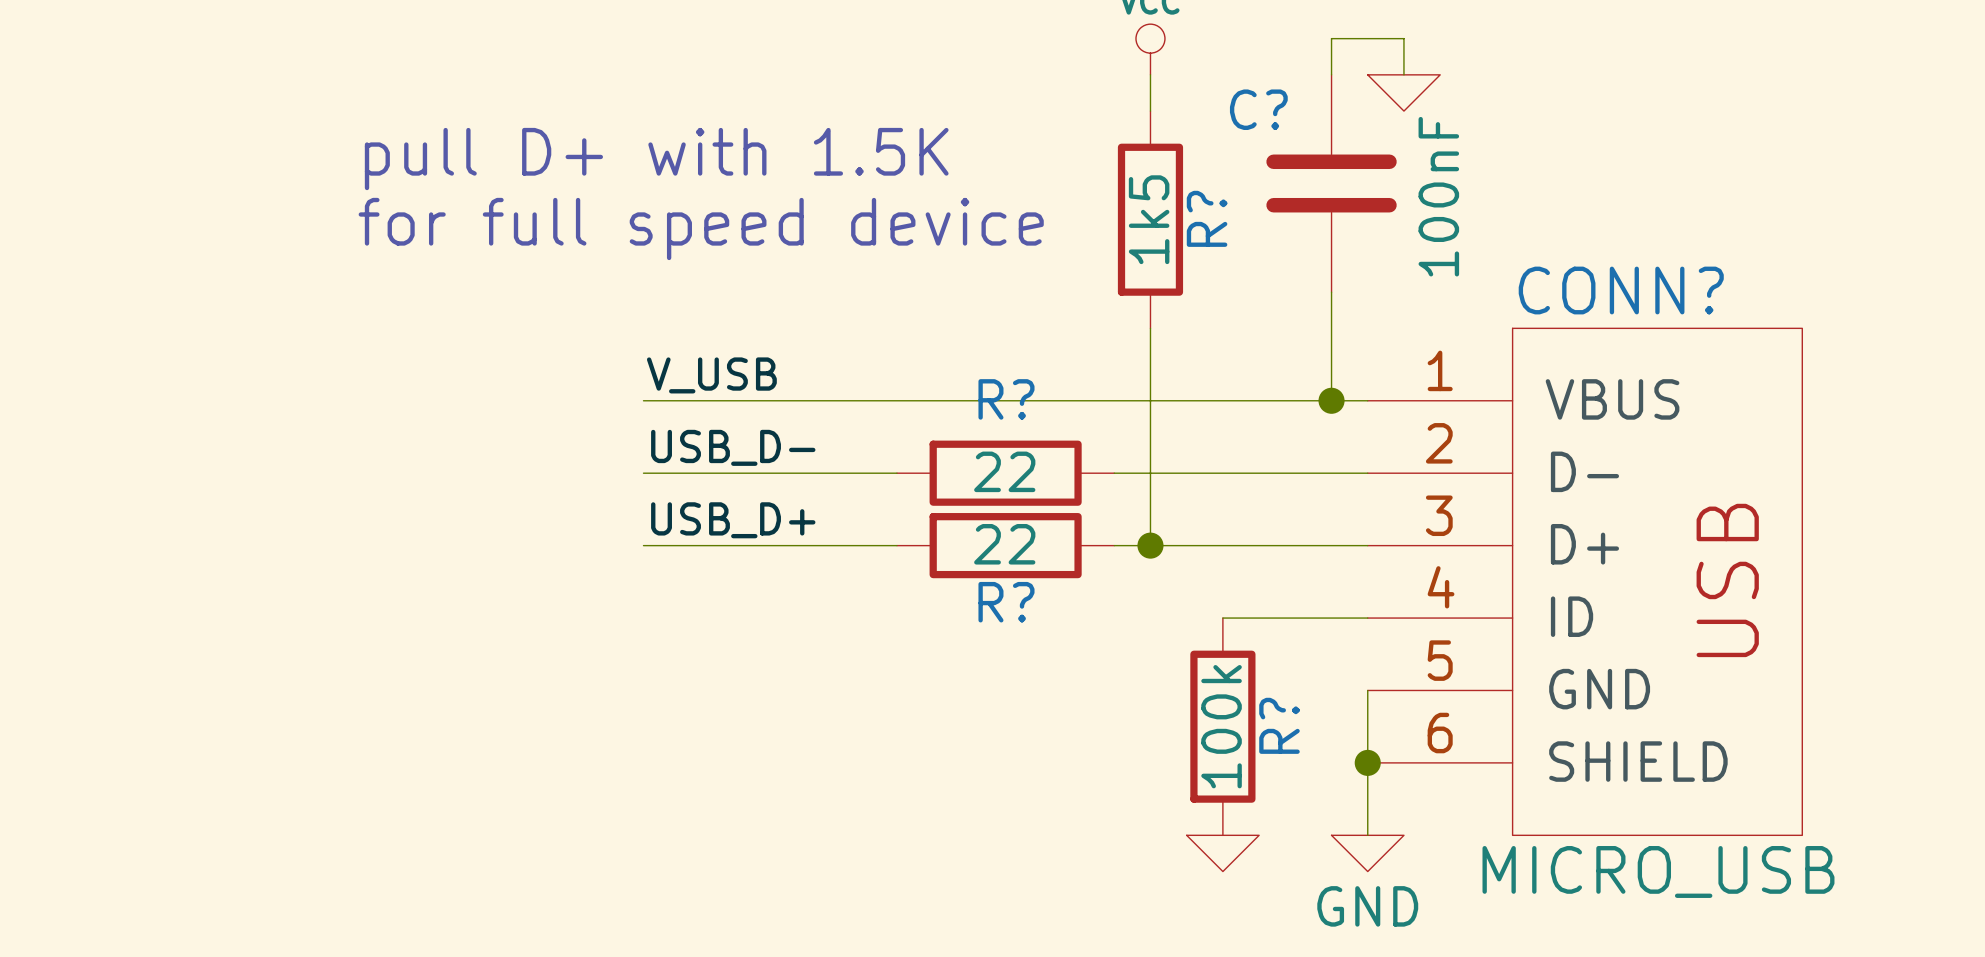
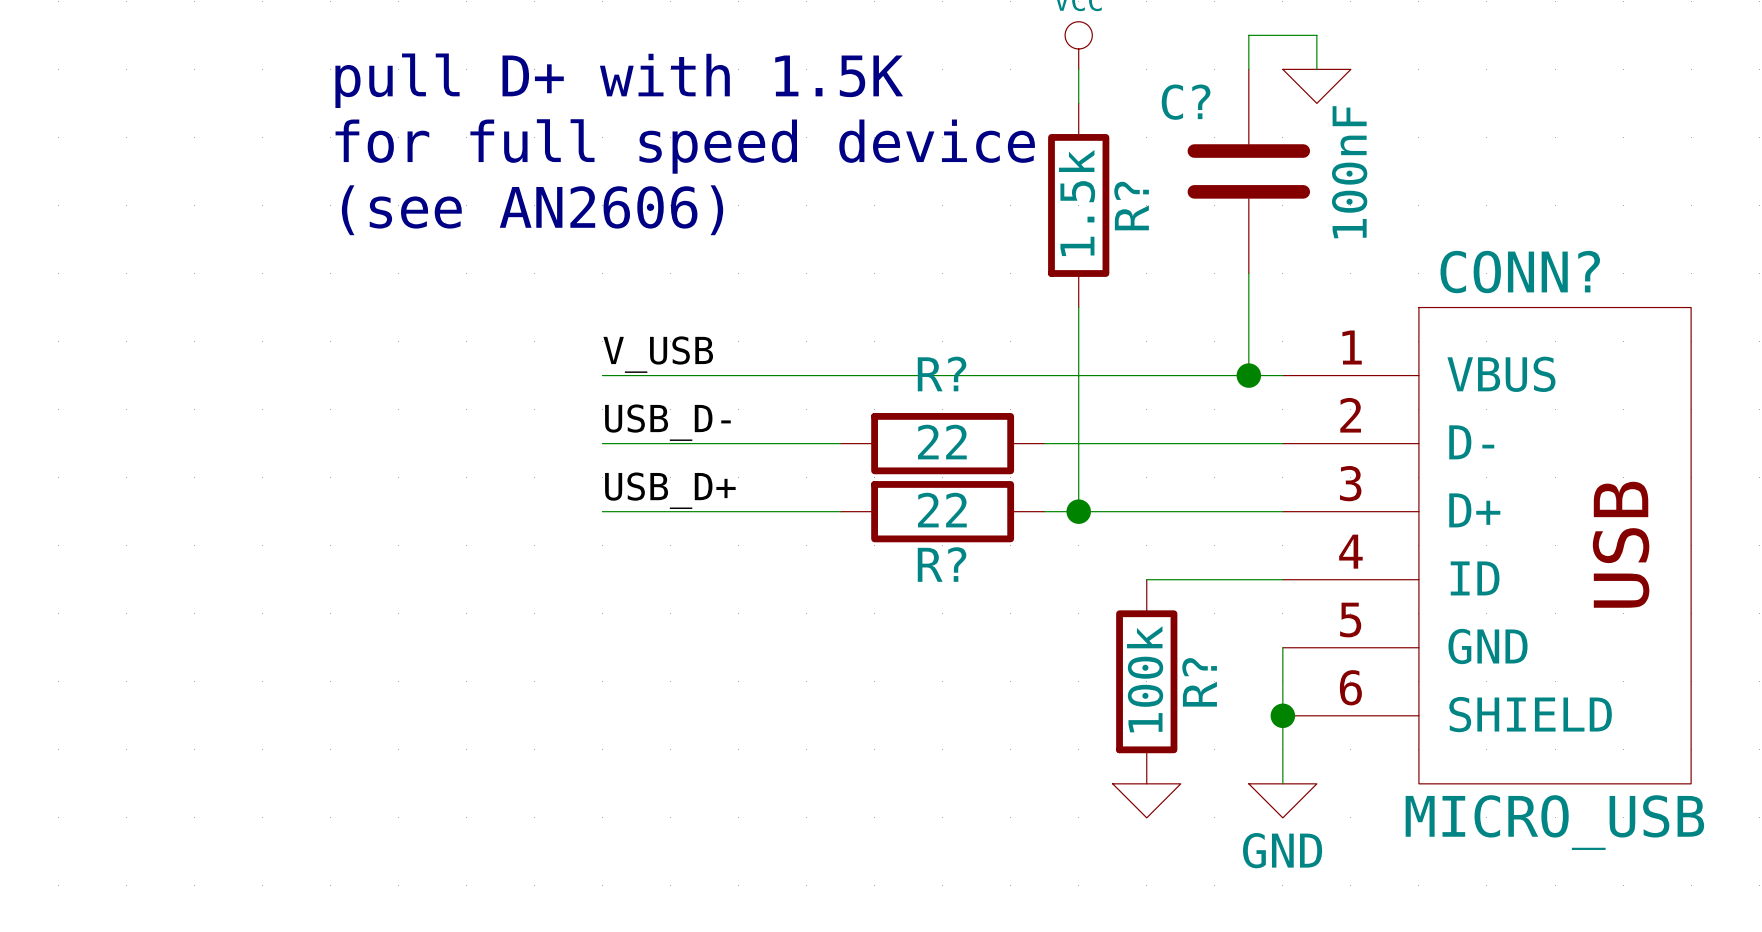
text: none -> pull D+ with 1.5K (619, 80)
text: pull D+ with 1.5K (656, 159) -> for full speed device (685, 146)
R? value: 1k5 (1149, 219) -> 1.5k (1077, 203)
text: for full speed device (701, 228) -> (see AN2606) (532, 210)

